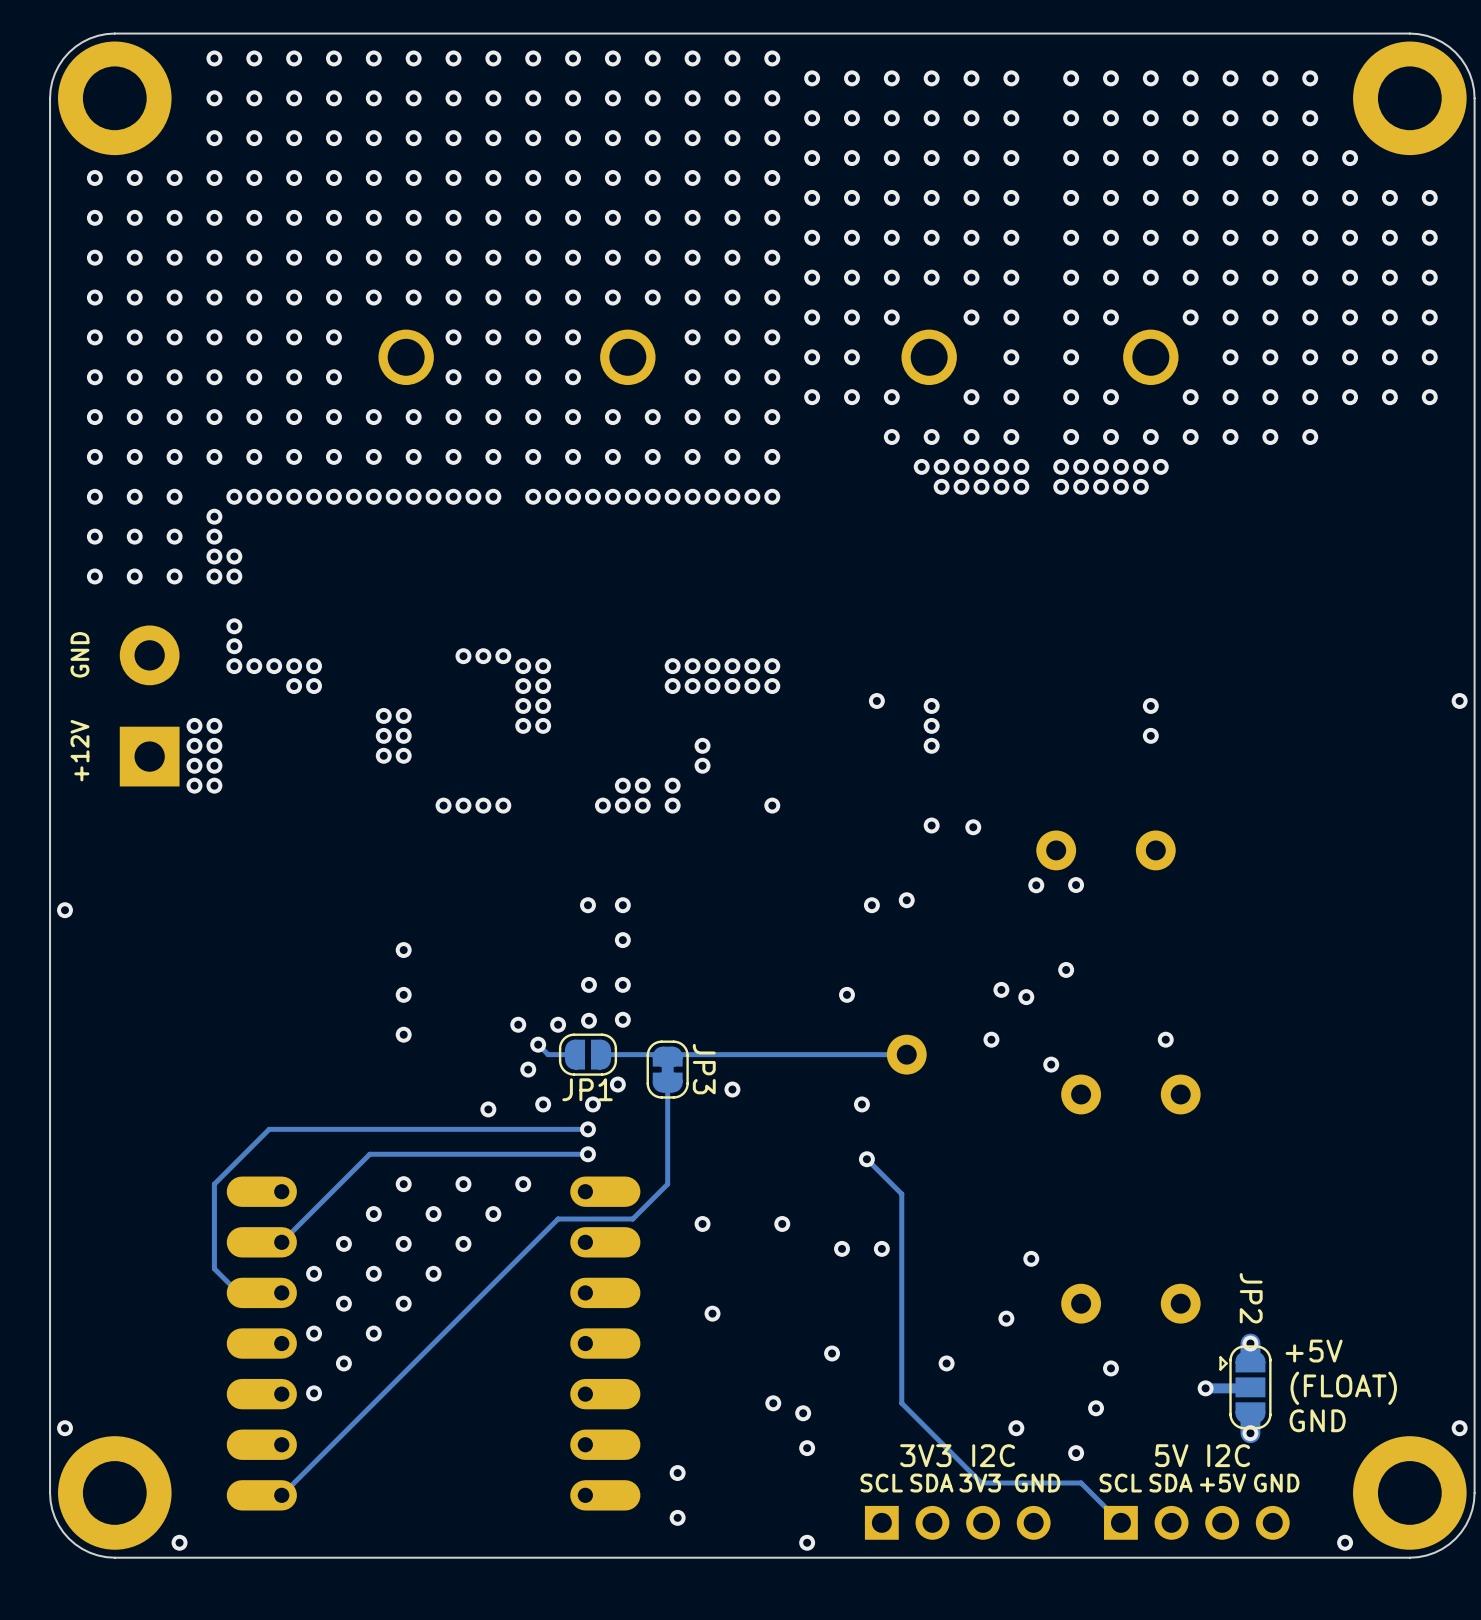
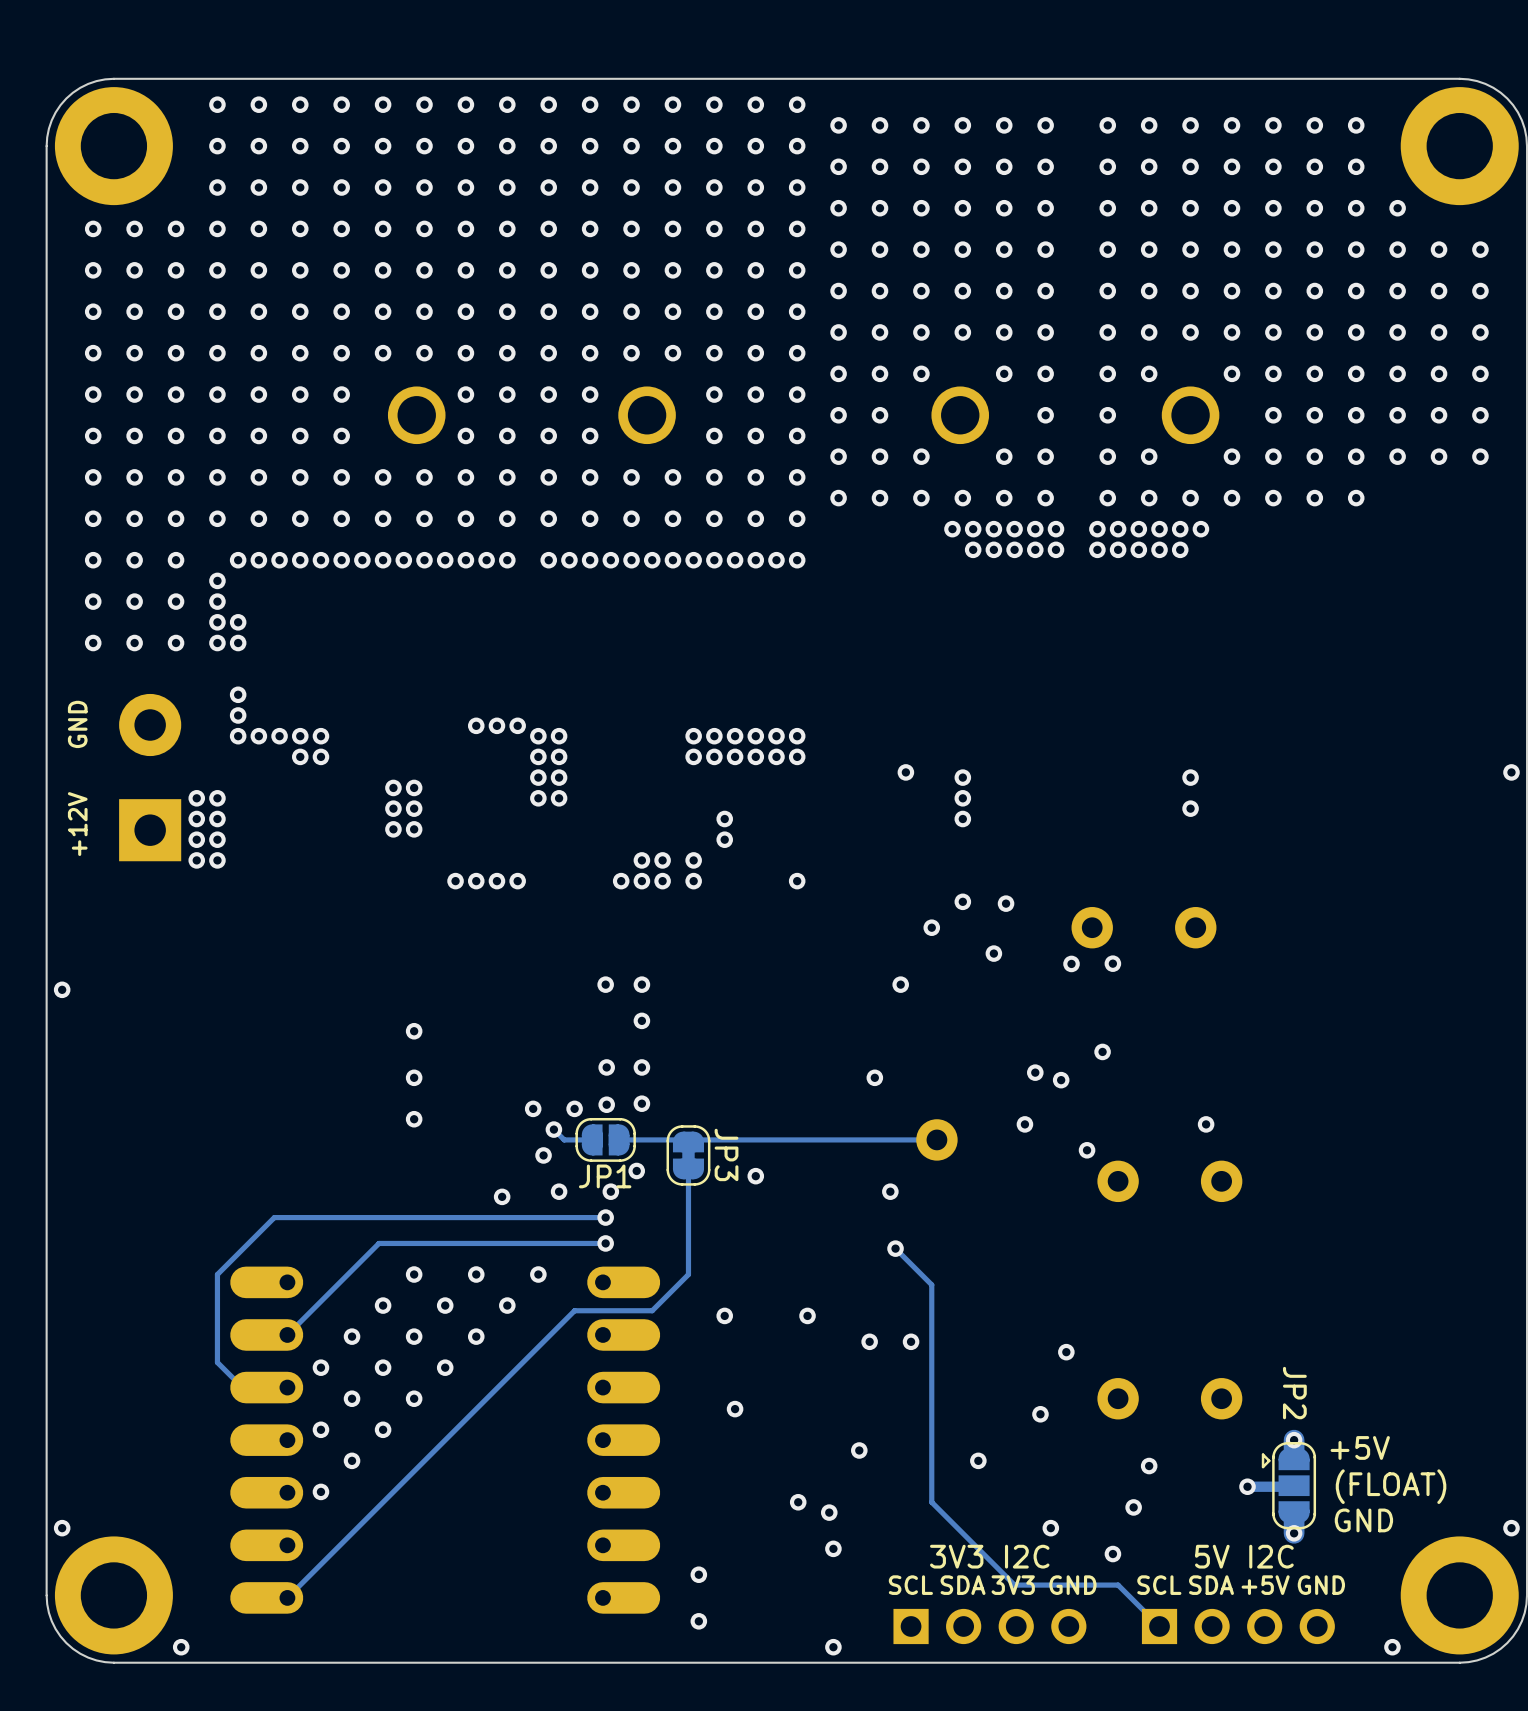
via: none -> (838, 498)
via: none -> (880, 498)
via: none -> (931, 927)
via: none -> (993, 953)
via: (906, 900) -> none

